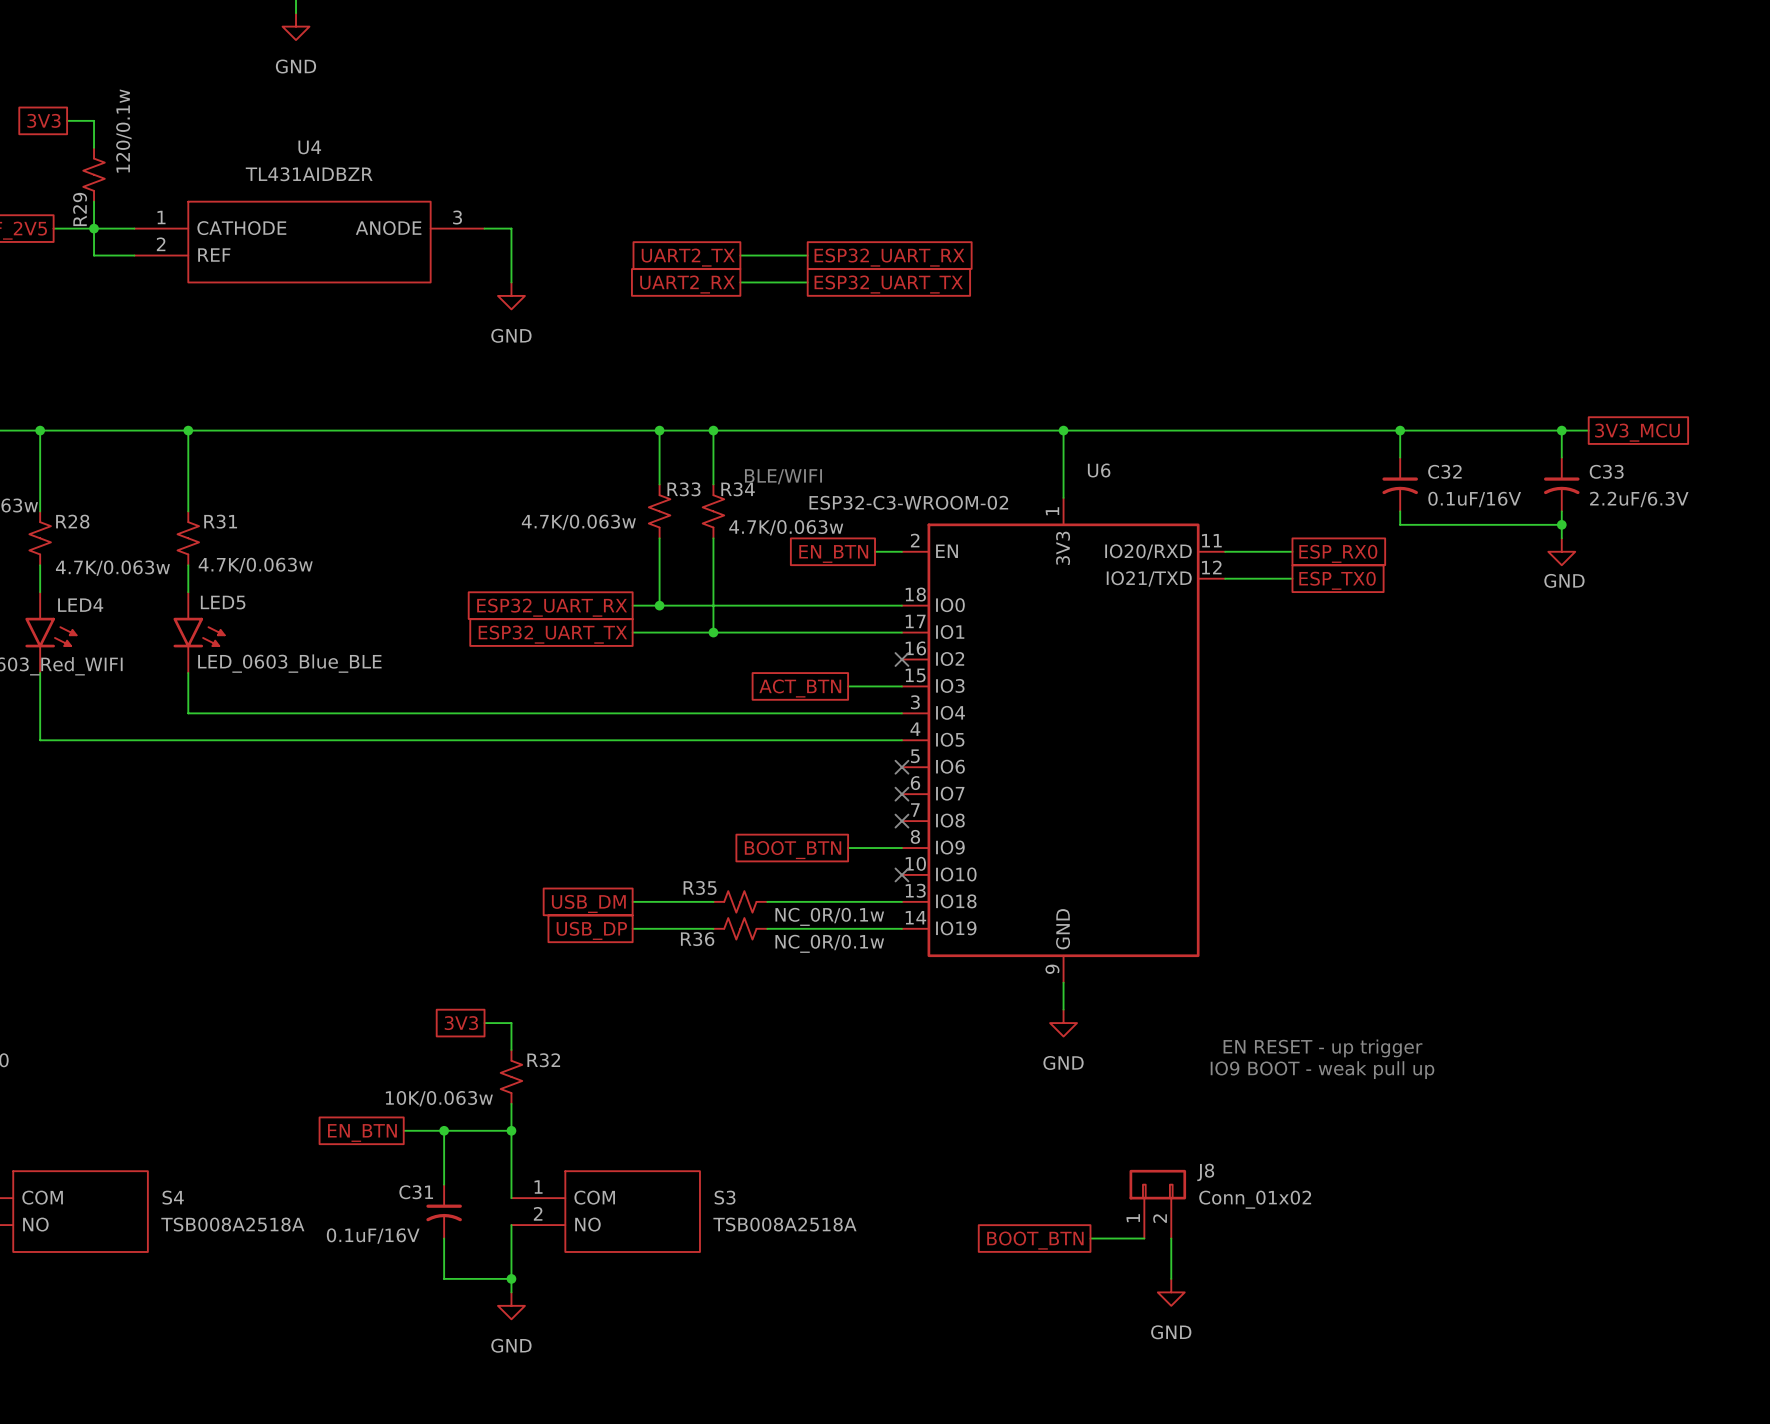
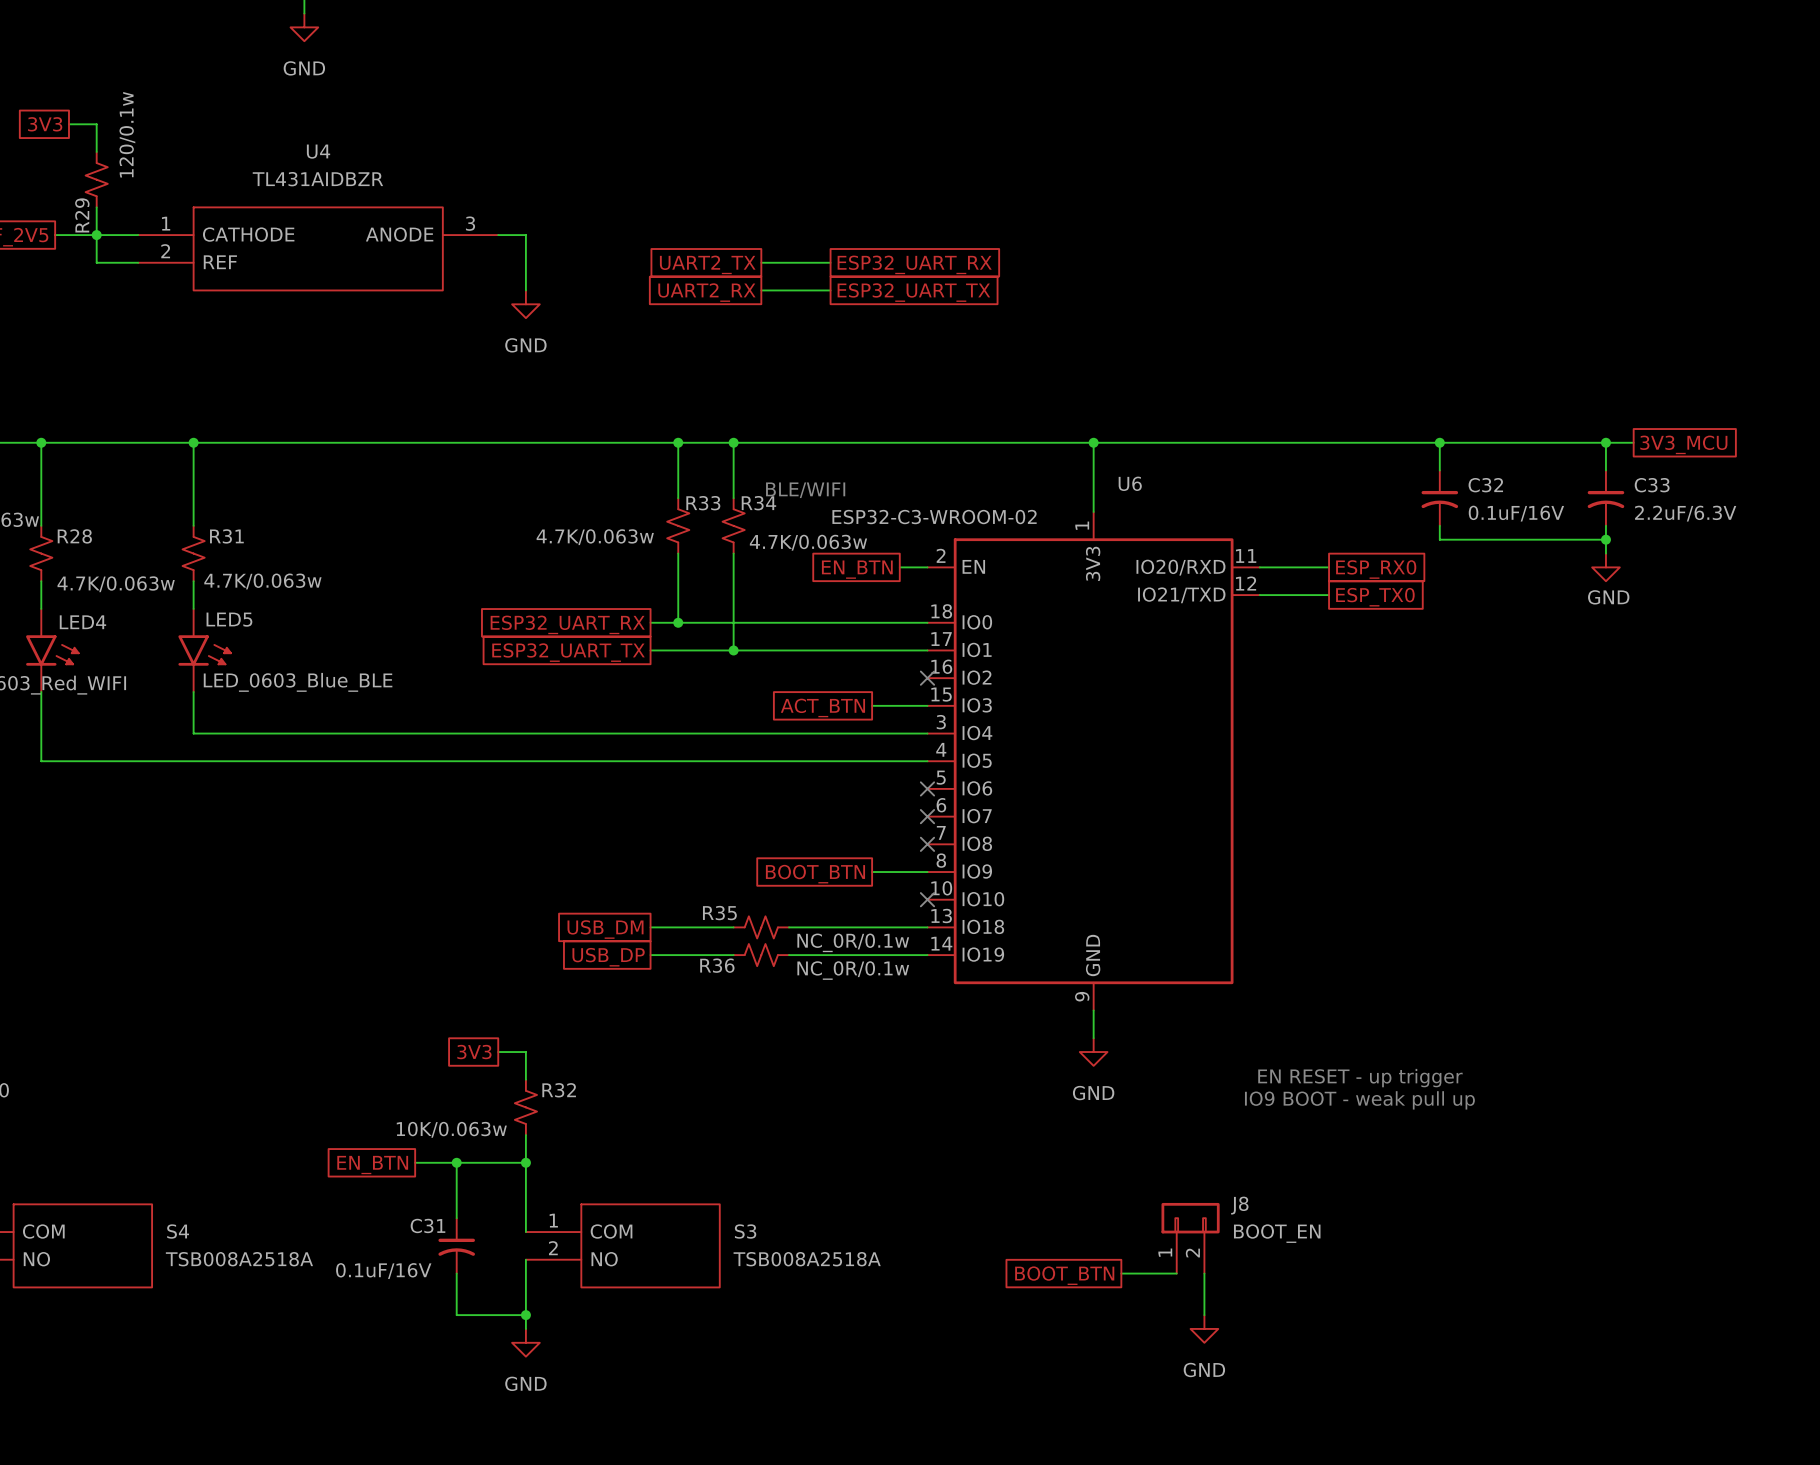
J8 value: Conn_01x02 (1255, 1199) -> BOOT_EN (1277, 1233)

